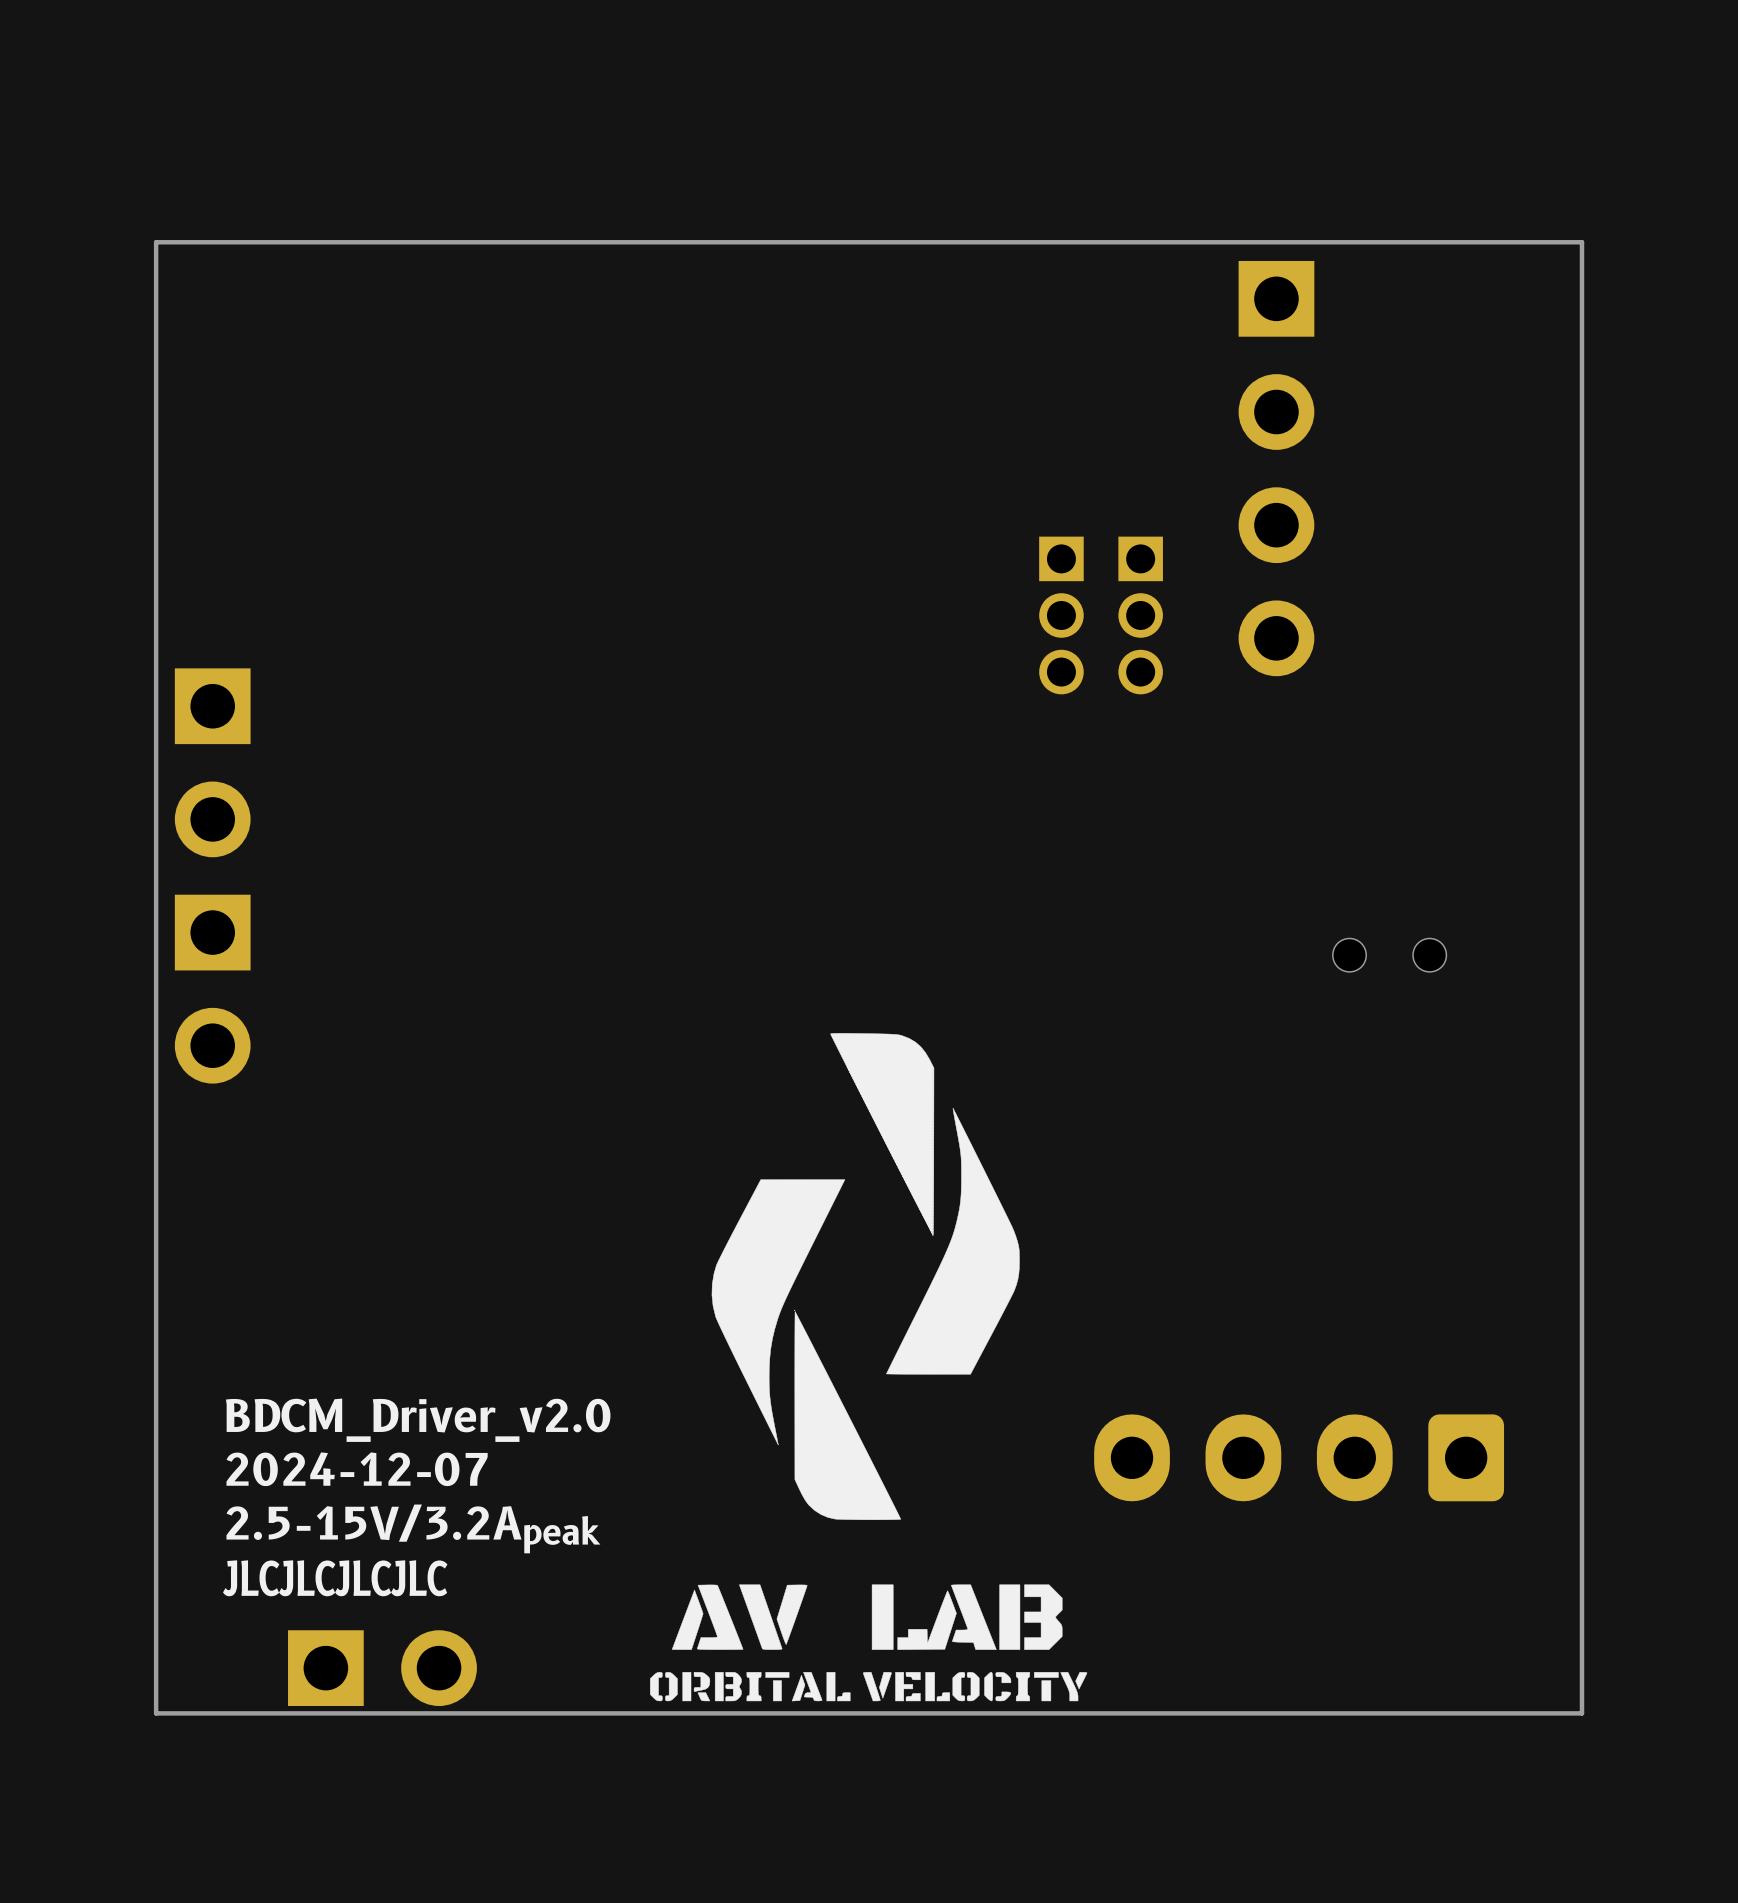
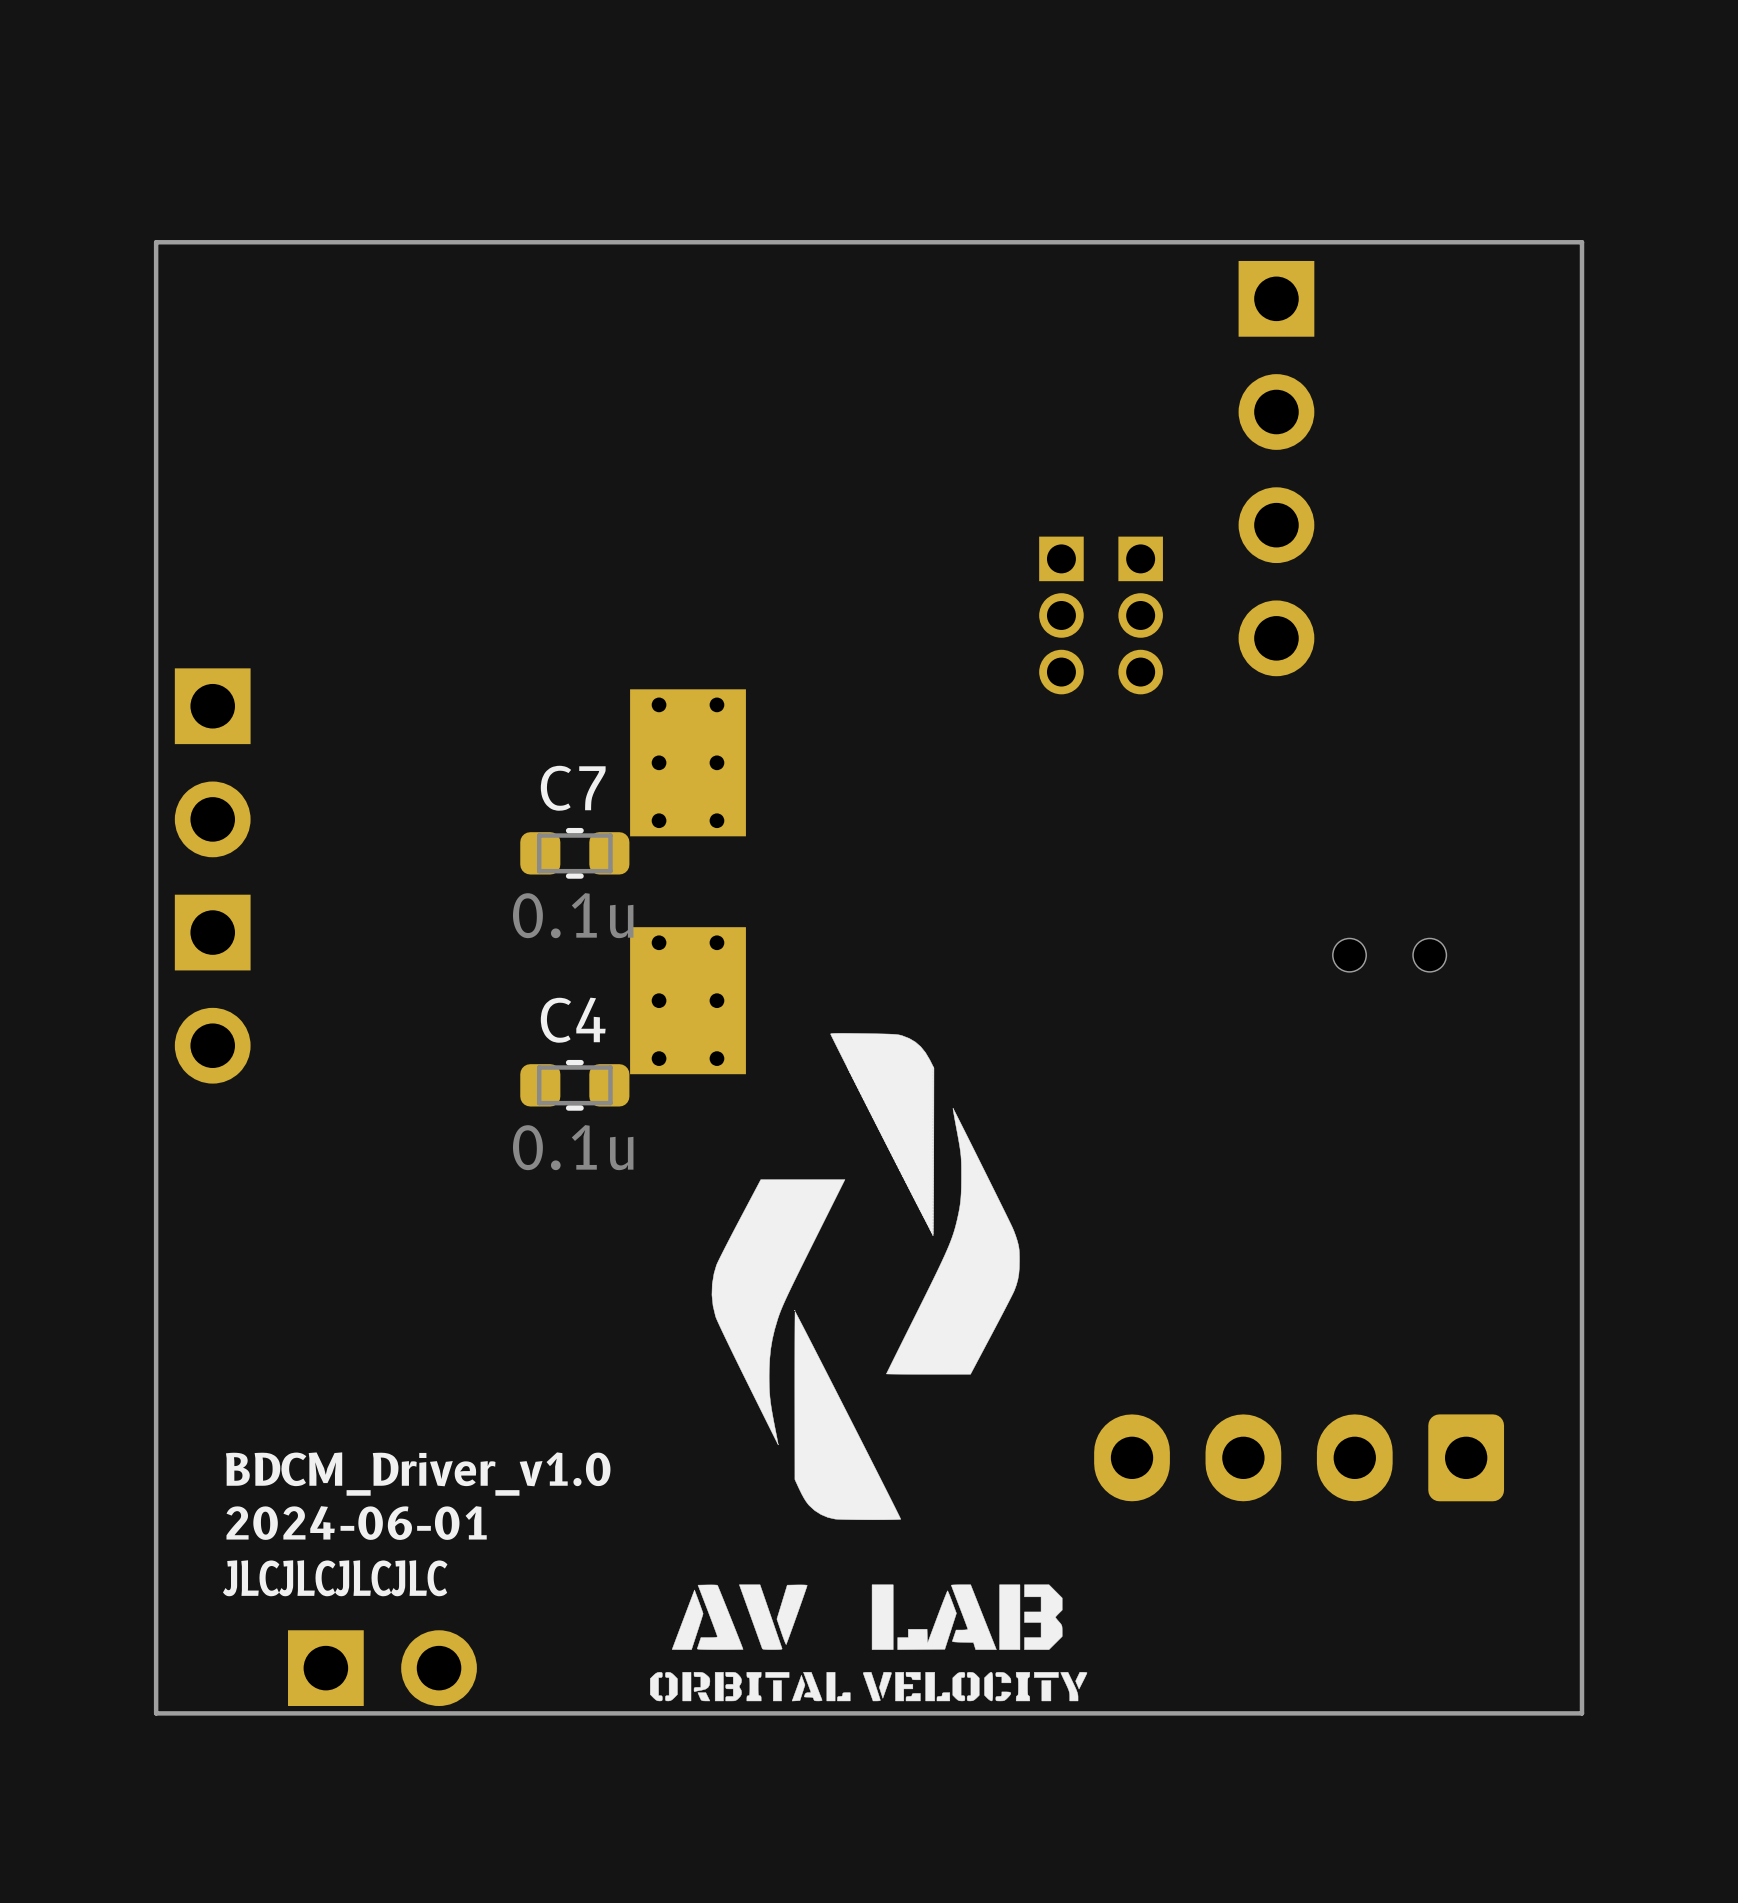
part: none -> (688, 762)
C7: none -> 0.1u (574, 853)
part: none -> (688, 1000)
C4: none -> 0.1u (574, 1085)
text: BDCM_Driver_v2.0 (418, 1420) -> none
text: 2024-12-07 (357, 1469) -> BDCM_Driver_v1.0 (418, 1474)
text: 2.5-15V/3.2Apeak (413, 1528) -> 2024-06-01 (356, 1523)

